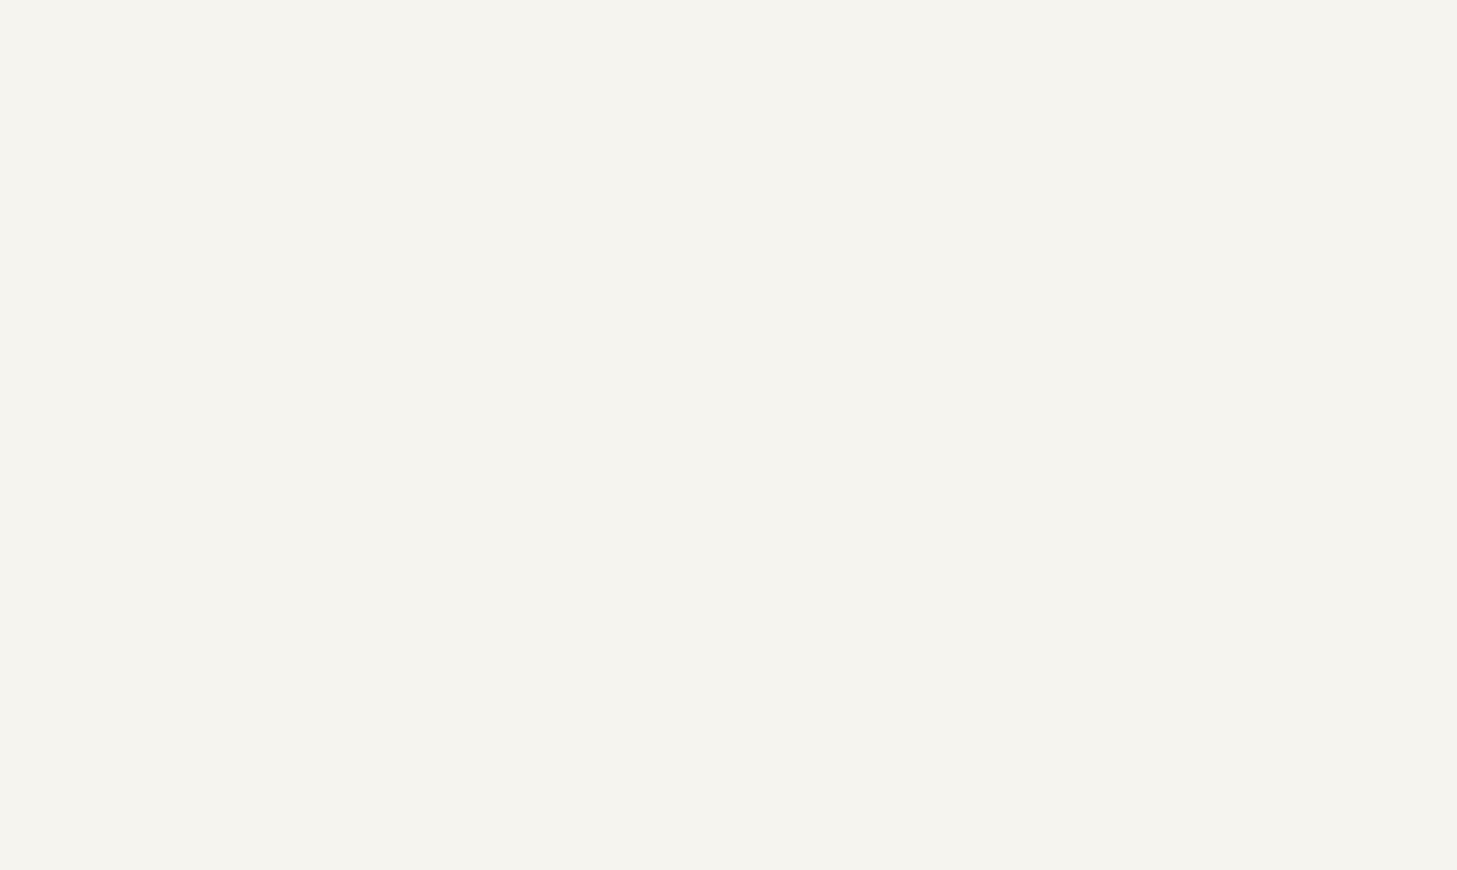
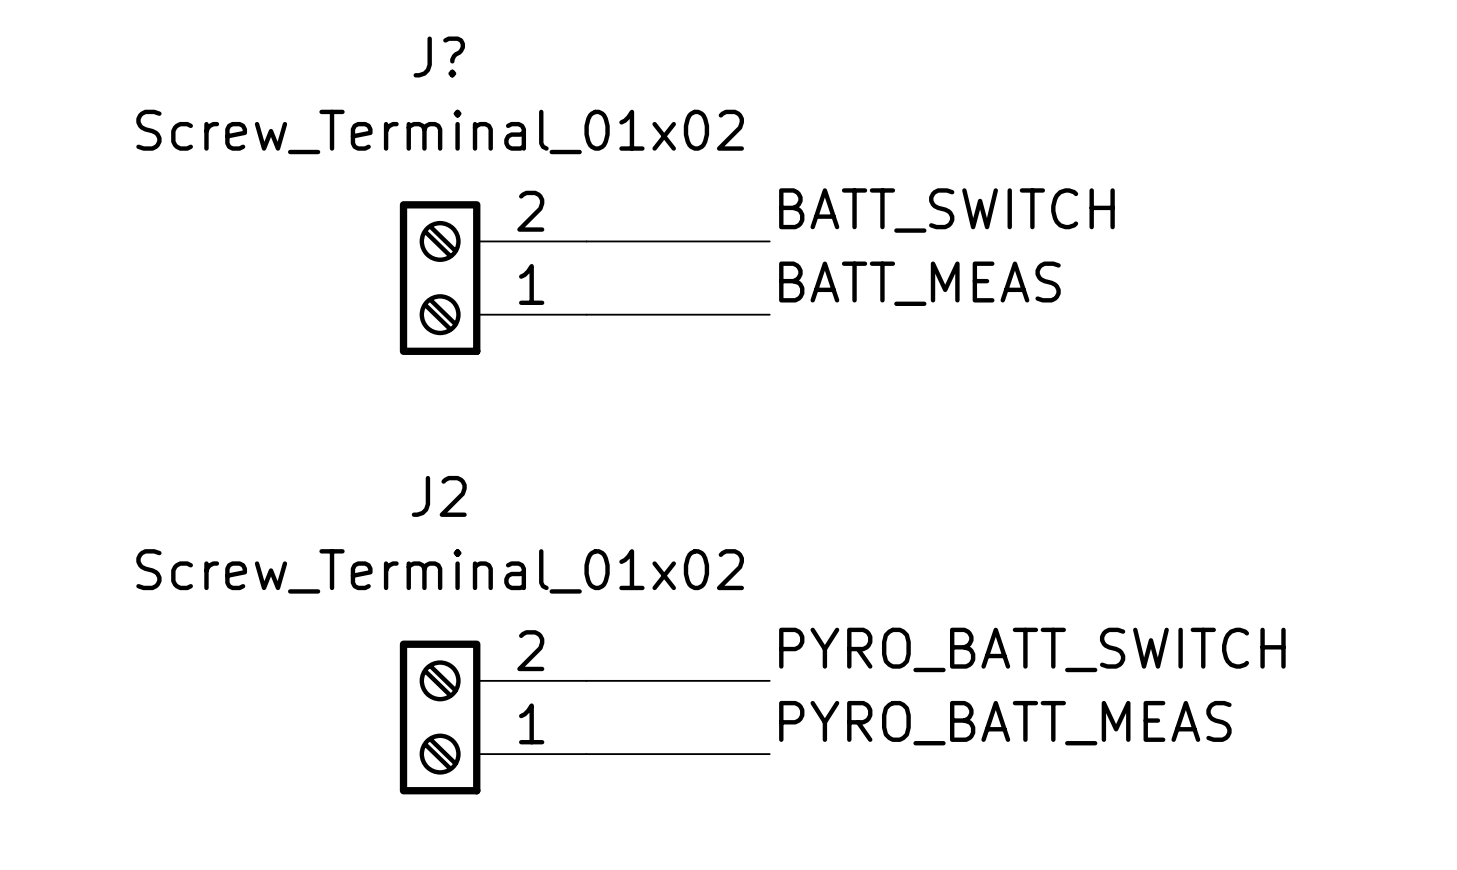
label: none -> BATT_SWITCH (946, 210)
wire: none -> (586, 241) (769, 241)
J?: none -> Screw_Terminal_01x02 (493, 278)
label: none -> BATT_MEAS (919, 283)
wire: none -> (586, 314) (769, 314)
label: none -> PYRO_BATT_SWITCH (1032, 649)
wire: none -> (586, 680) (769, 680)
J2: none -> Screw_Terminal_01x02 (493, 717)
label: none -> PYRO_BATT_MEAS (1005, 723)
wire: none -> (586, 754) (769, 754)

